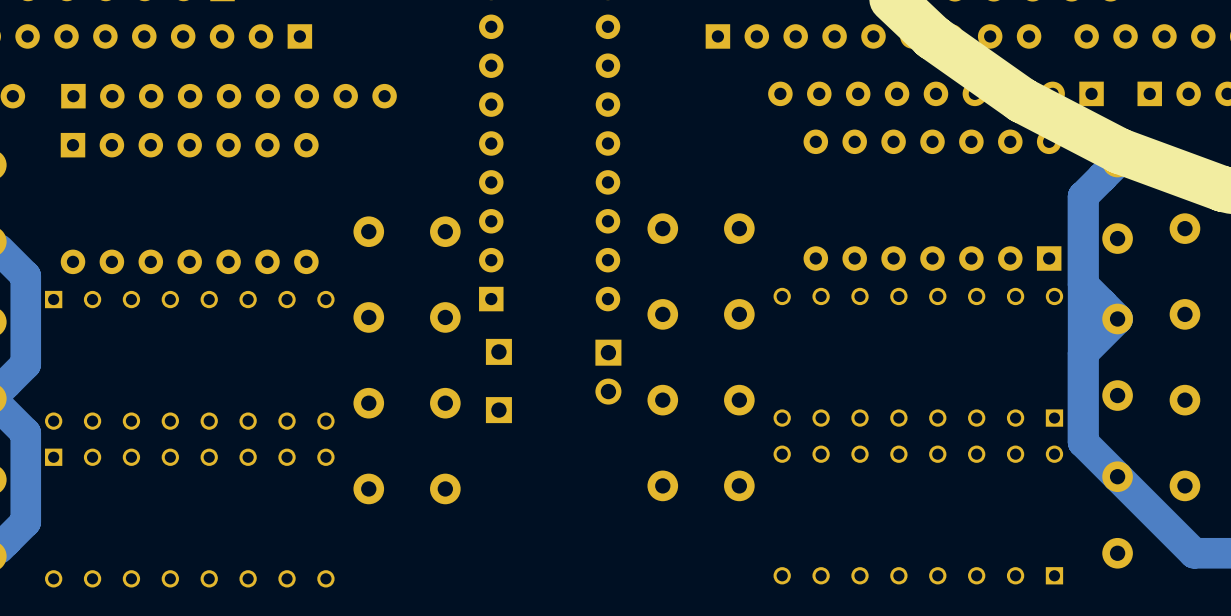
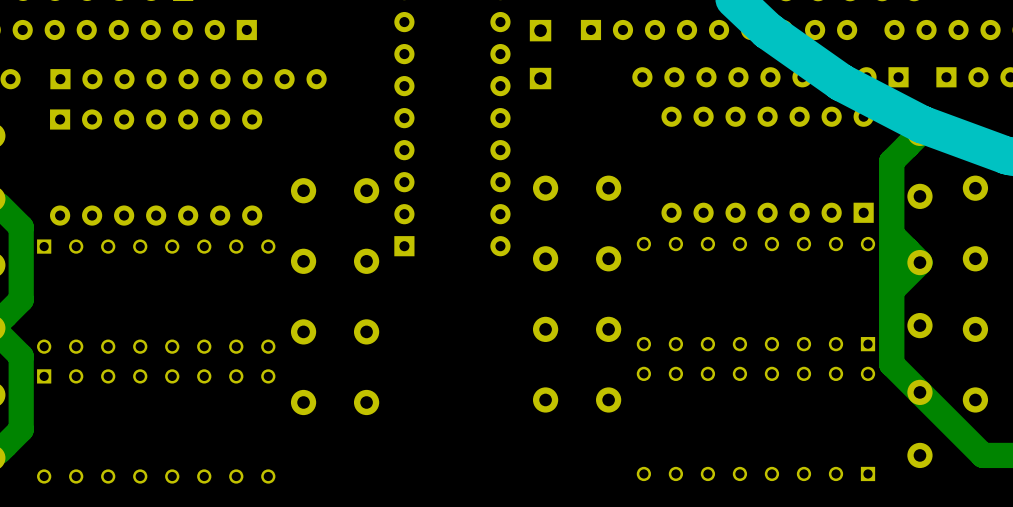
part: none -> (540, 30)
part: none -> (540, 78)
part: (498, 351) -> none
part: (608, 372) -> none
part: (498, 410) -> none

